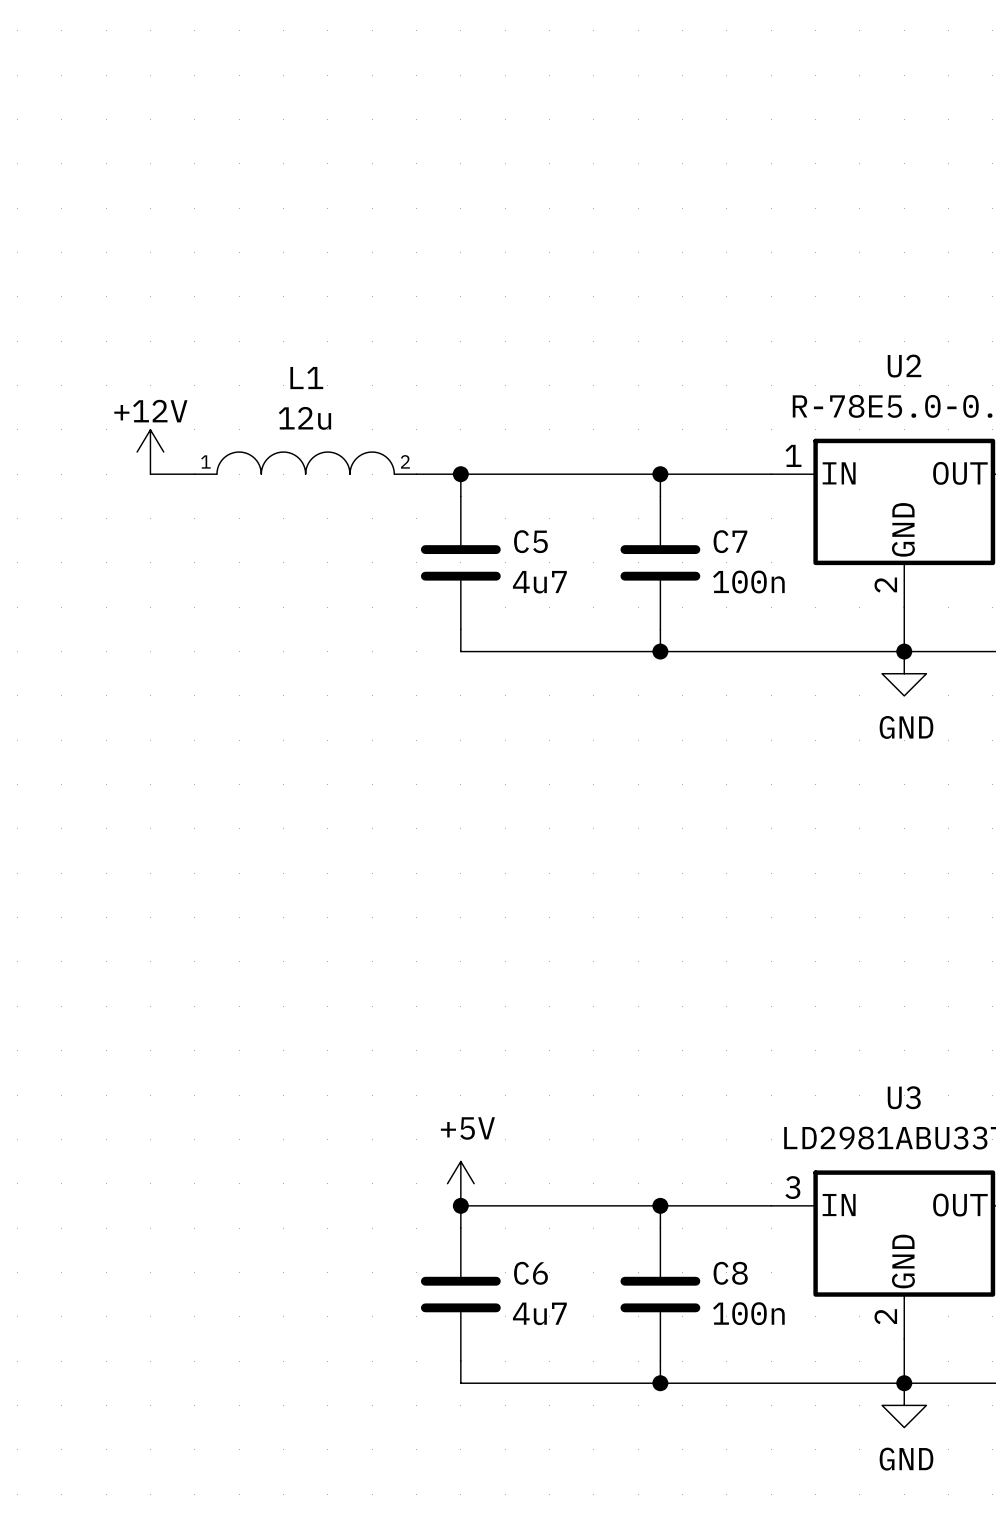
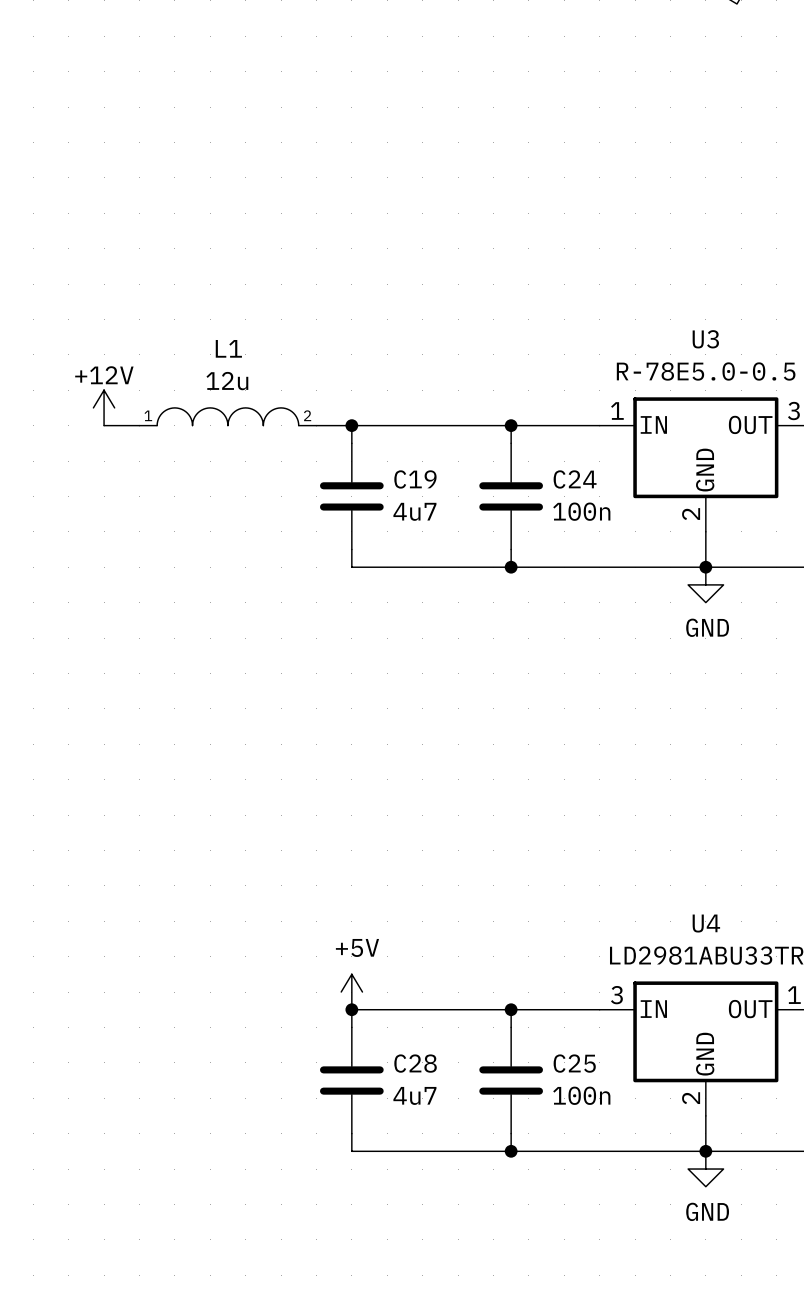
U2 name: U2 (904, 366) -> U3 (705, 339)
C5 name: C5 (530, 541) -> C19 (415, 479)
C7 name: C7 (730, 541) -> C24 (575, 479)
U3 name: U3 (904, 1097) -> U4 (706, 923)
C6 name: C6 (530, 1273) -> C28 (415, 1063)
C8 name: C8 (730, 1273) -> C25 (574, 1063)

